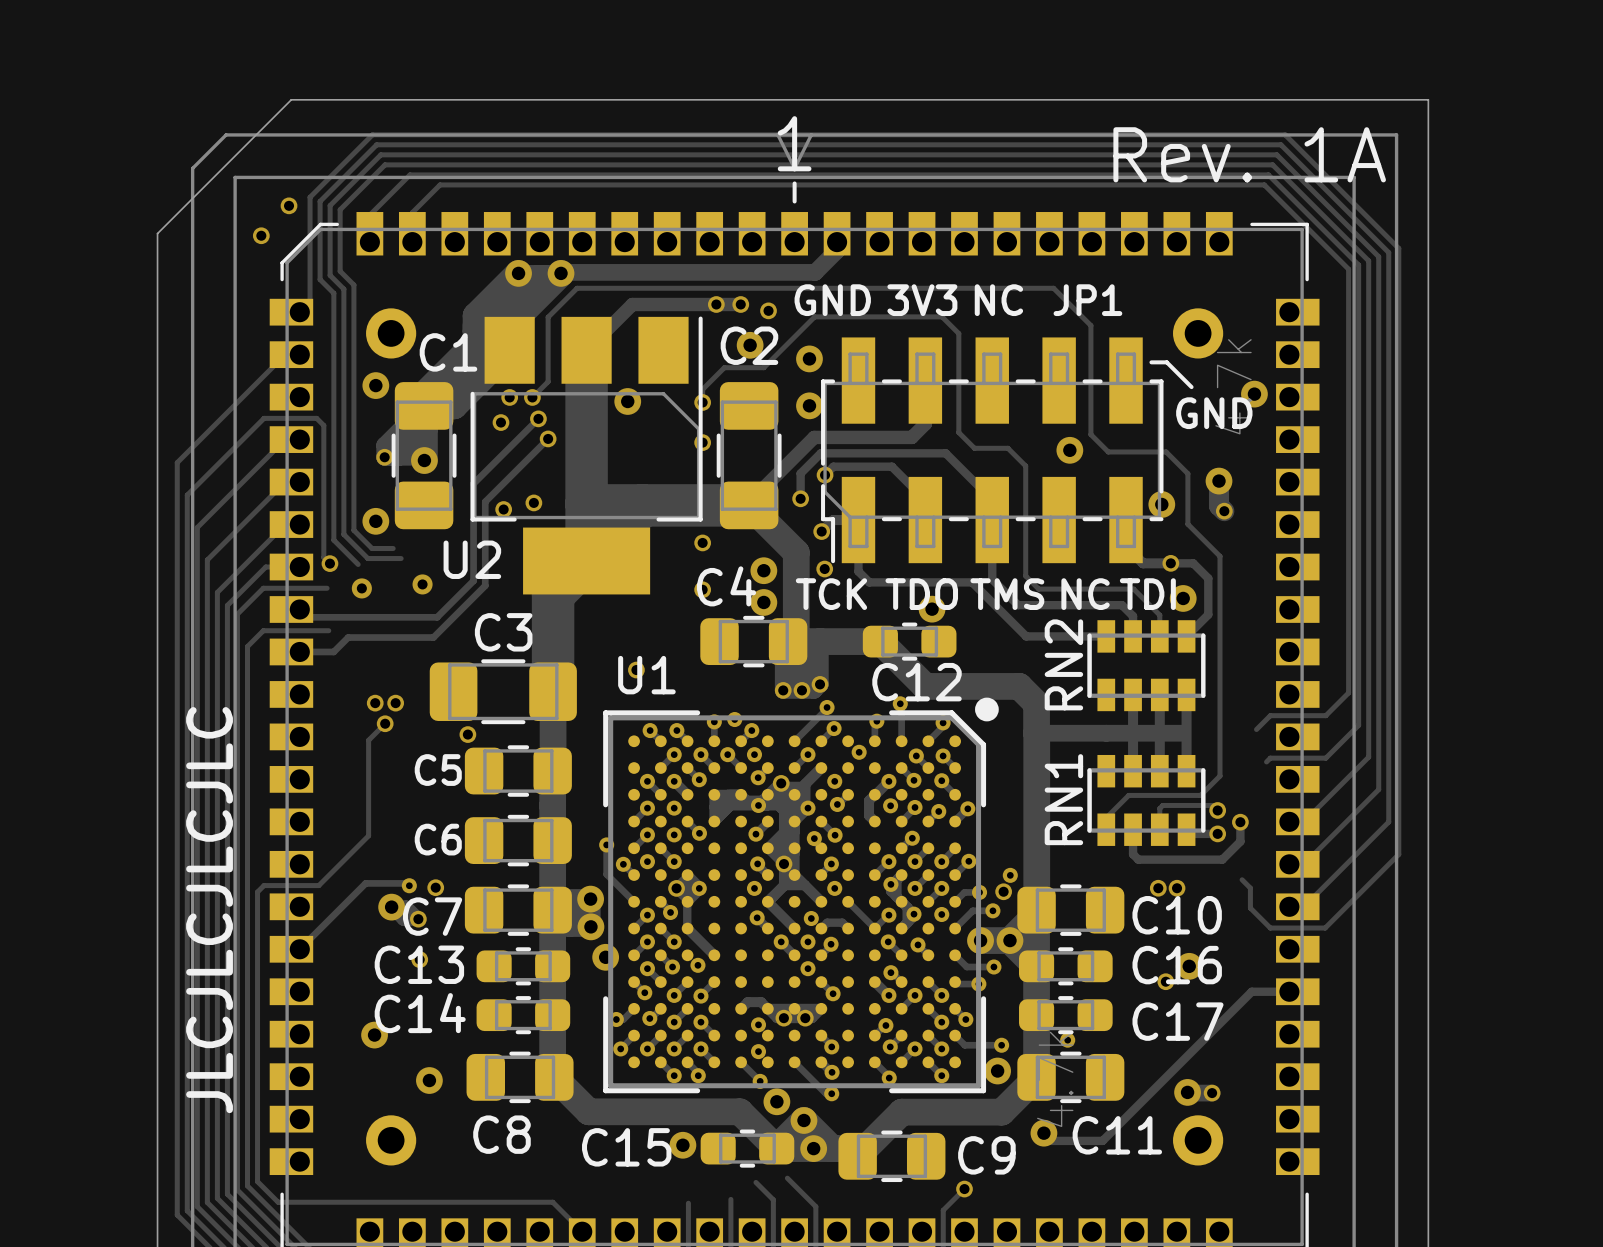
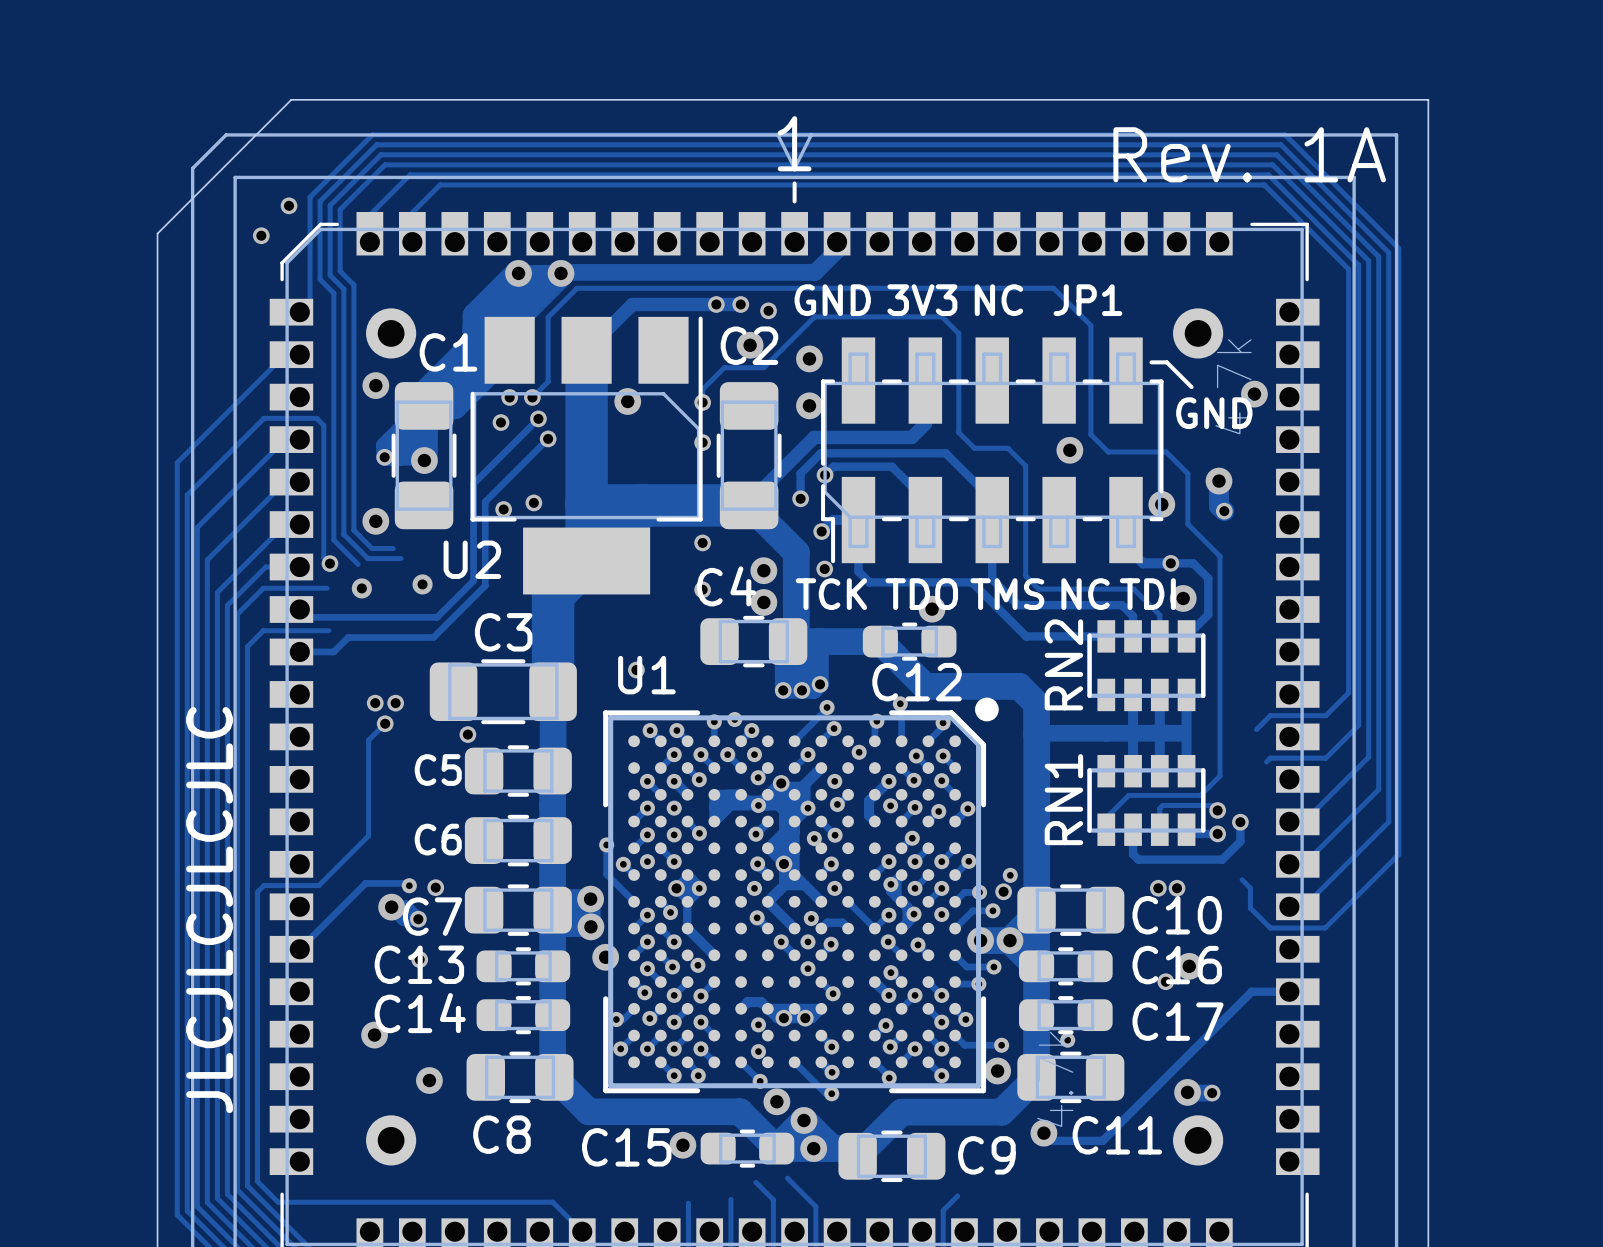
via: (964, 1189) -> none

